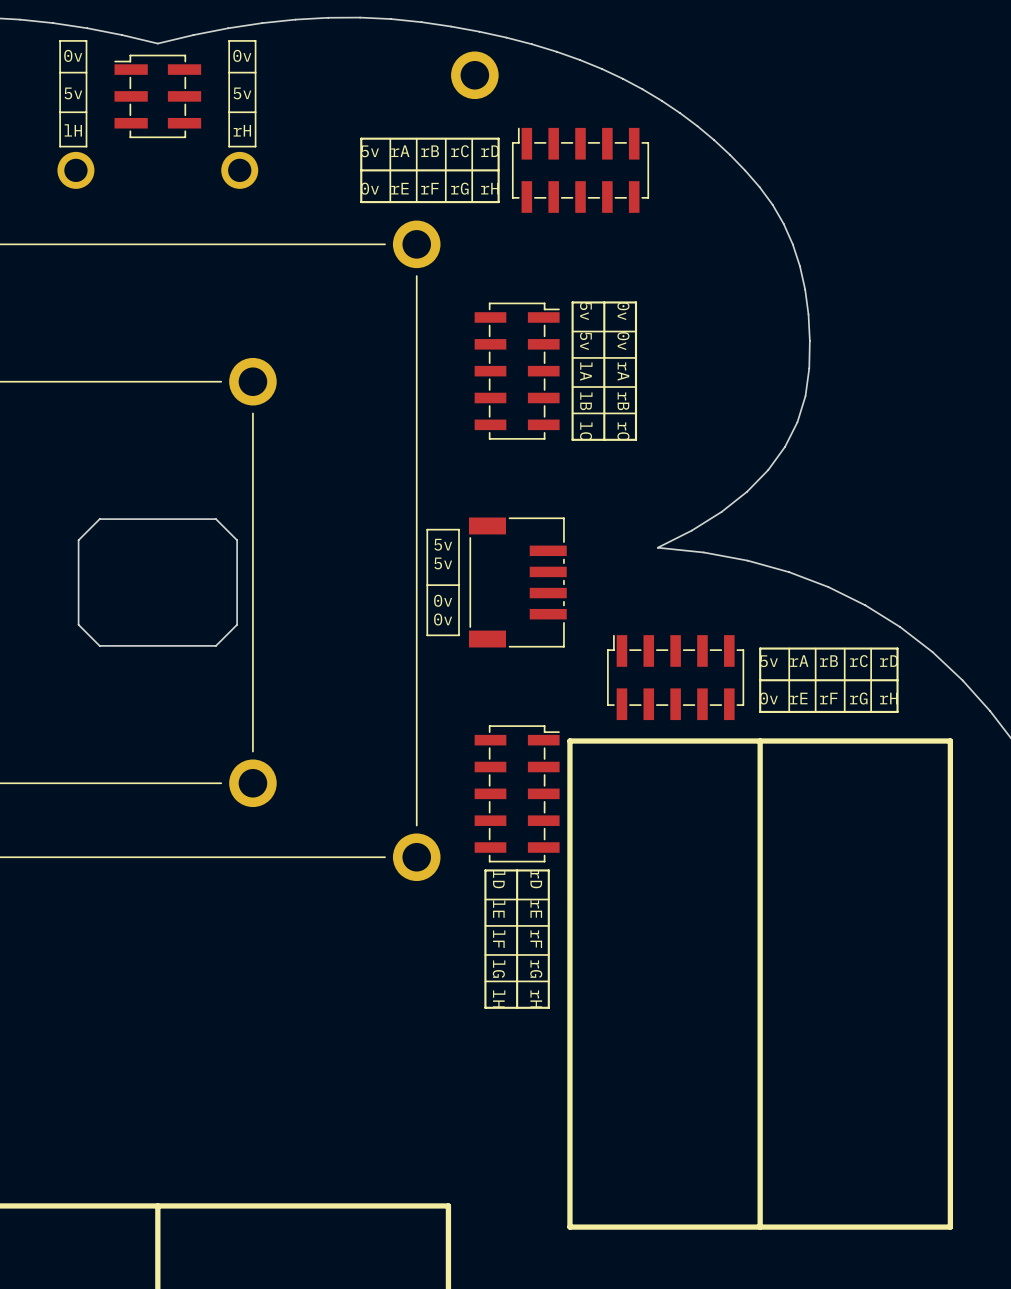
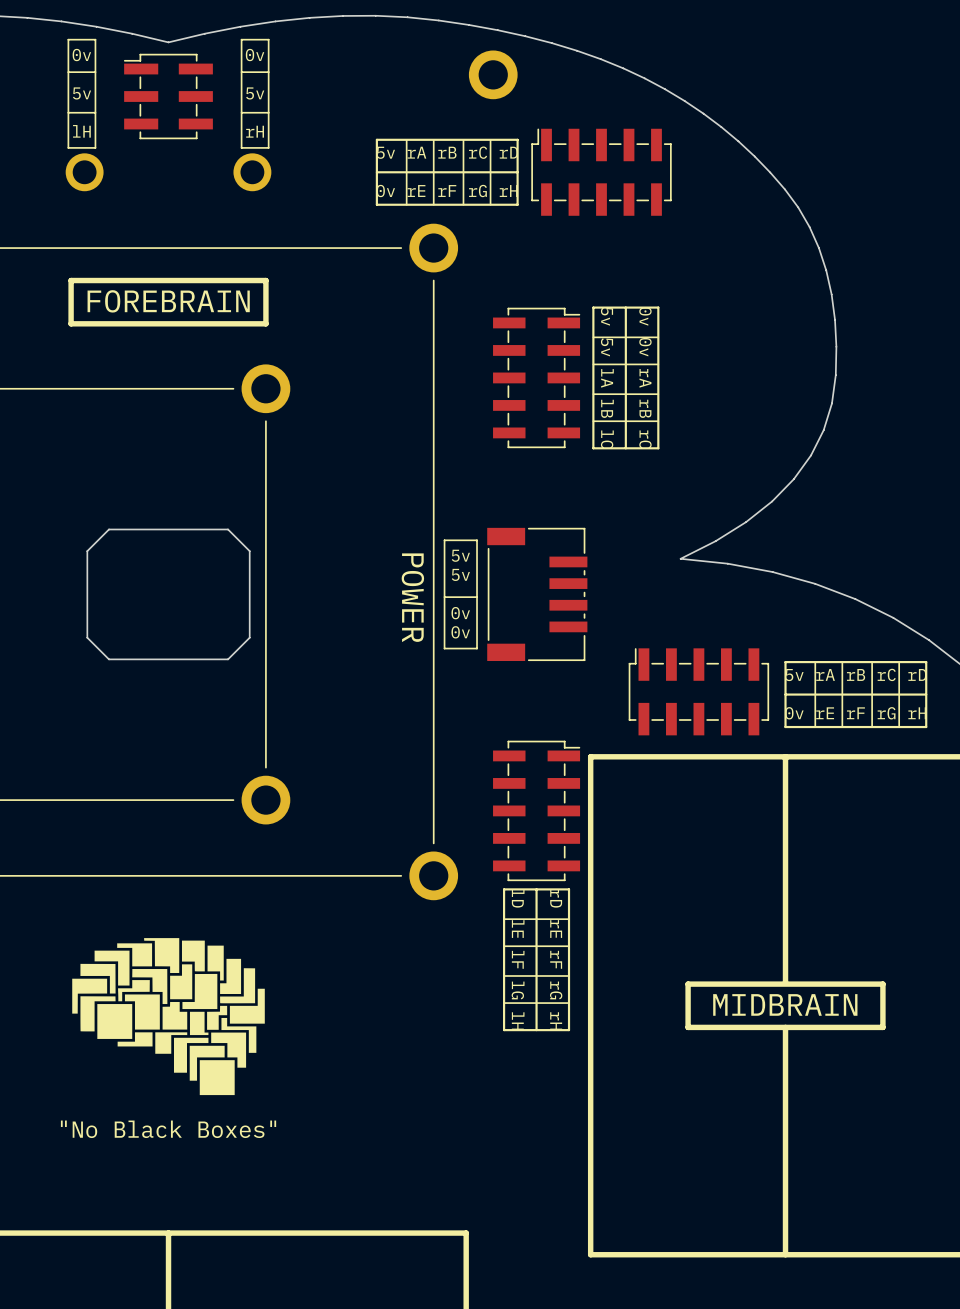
line: none -> (71, 280) (71, 323) (265, 323) (265, 280) (71, 280)
text: none -> FOREBRAIN (168, 301)
text: none -> POWER (412, 597)
drawing: none -> [72, 938, 265, 1096]
line: (760, 960) (760, 1005) -> none
line: none -> (688, 984) (882, 984) (882, 1027) (688, 1027) (688, 984)
text: none -> MIDBRAIN (785, 1004)
text: none -> "No Black Boxes" (168, 1129)

